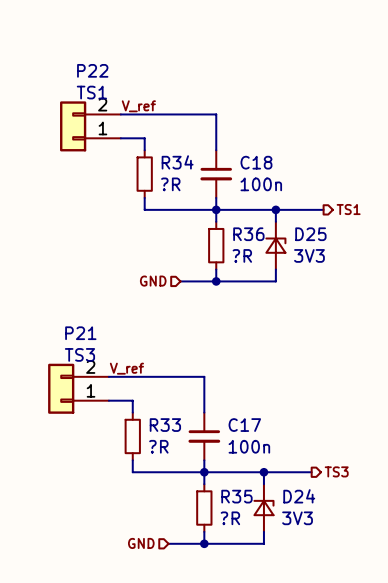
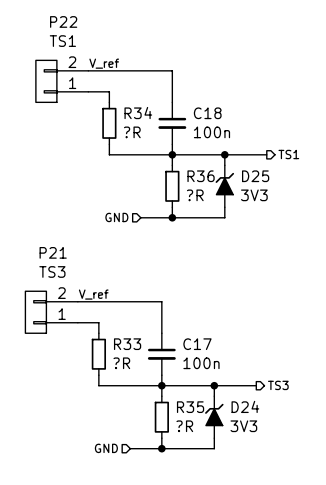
P22 symbol: [60, 101, 121, 152] -> [35, 60, 89, 103]
D25 symbol: [266, 221, 286, 270] -> [215, 165, 235, 208]
P21 symbol: [48, 363, 109, 414] -> [25, 291, 78, 334]
D24 symbol: [254, 484, 274, 532] -> [205, 396, 224, 439]

